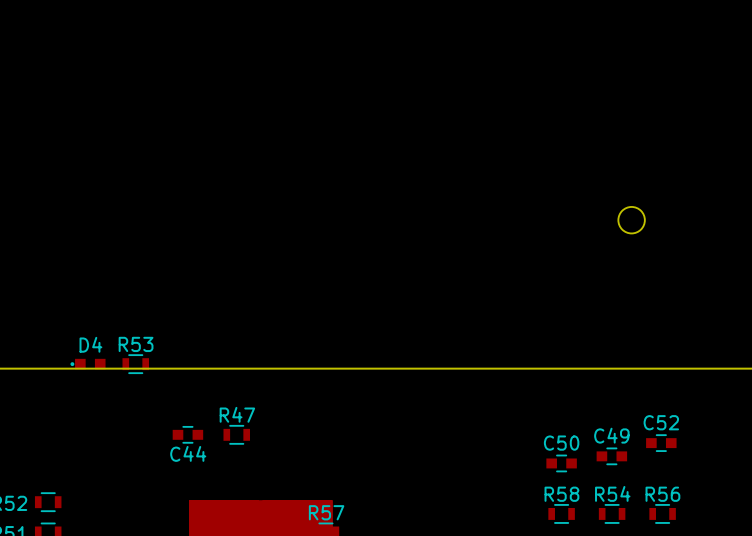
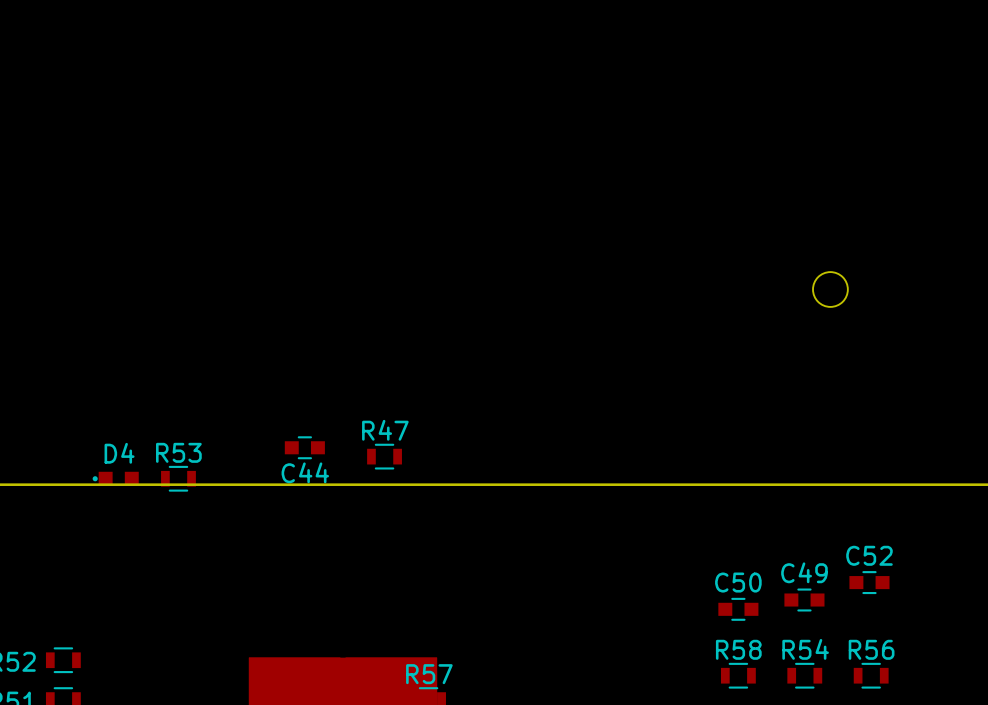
C44 position: (187, 434) -> (304, 447)
R47 position: (236, 434) -> (384, 456)

